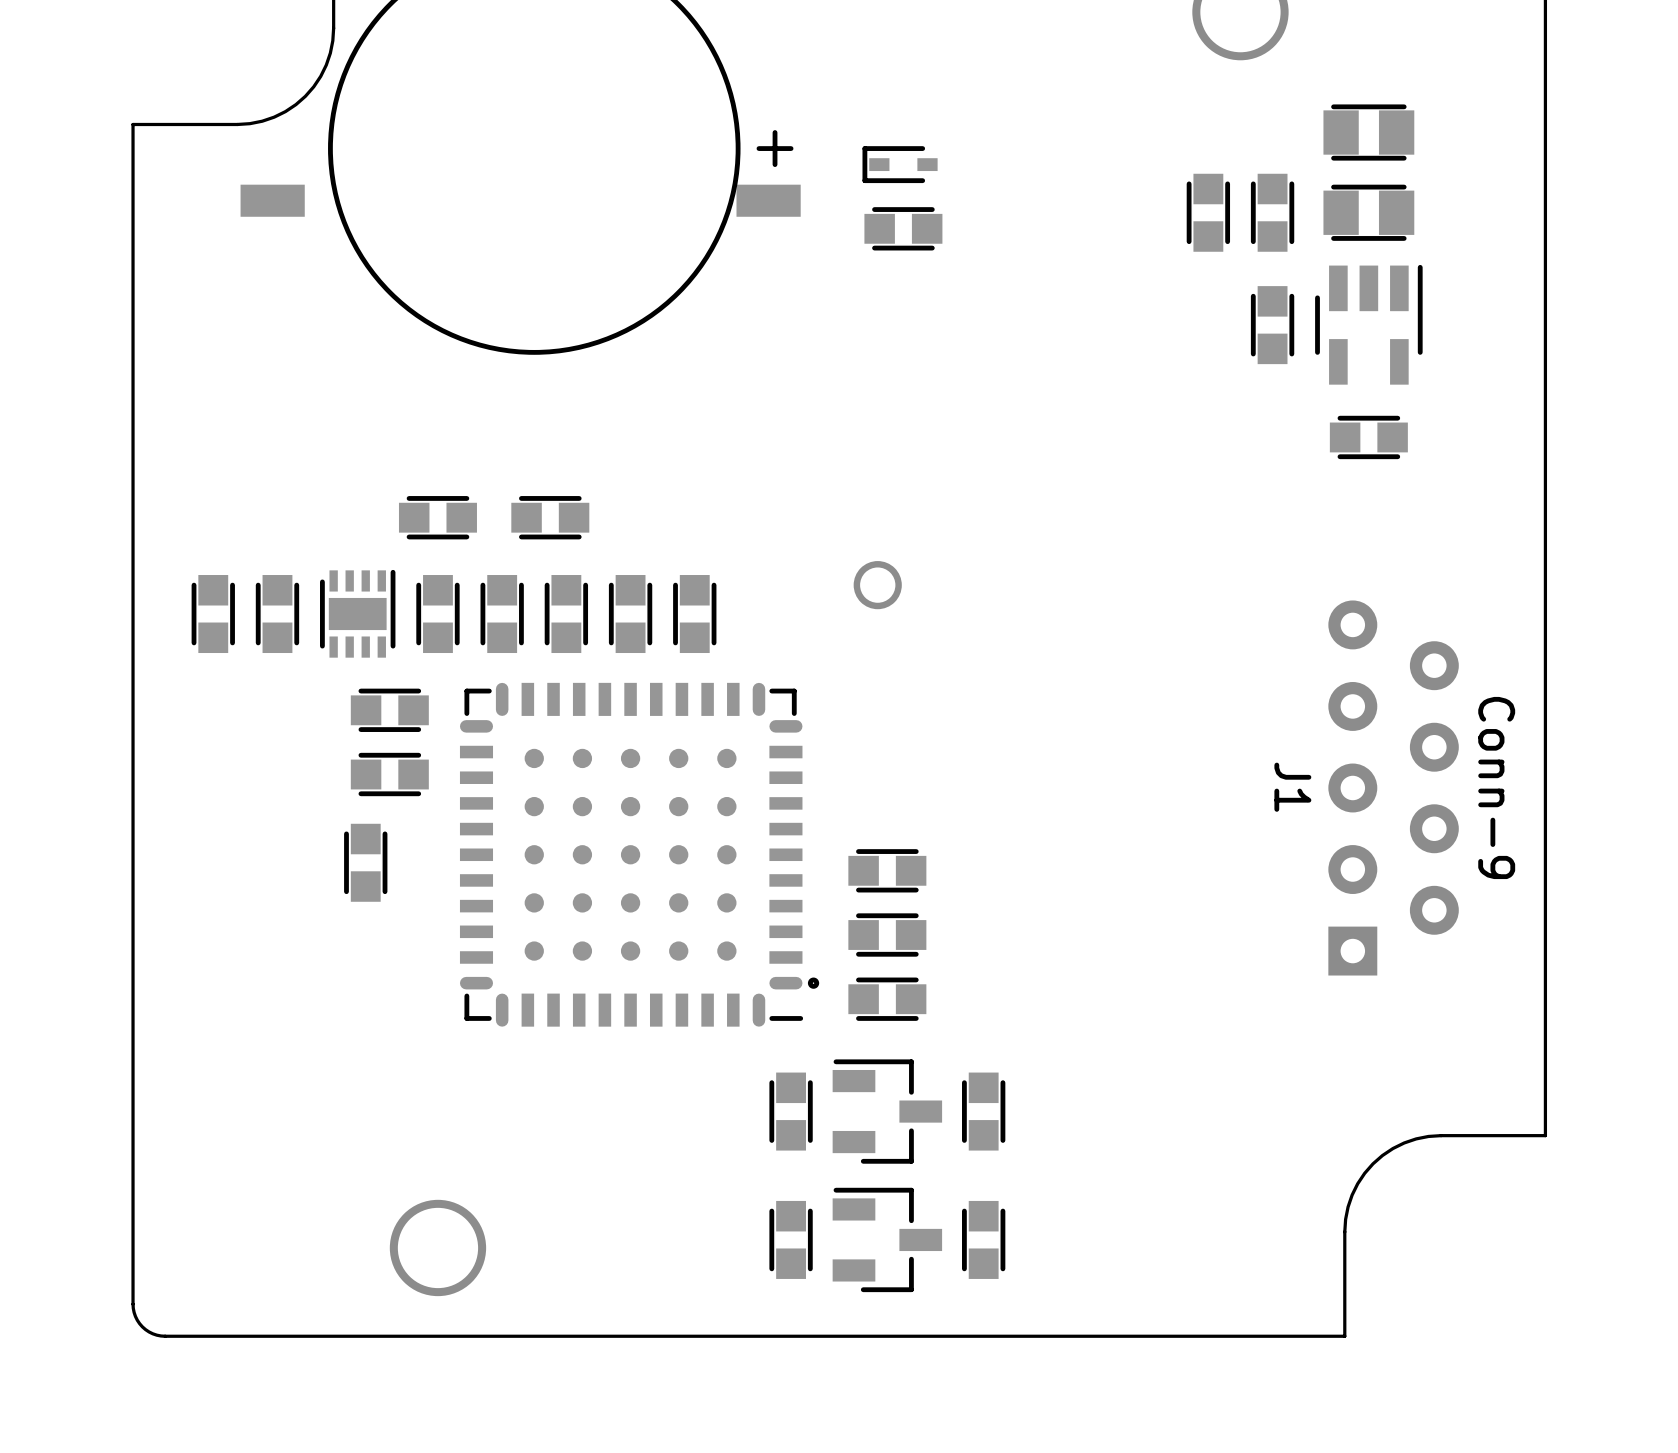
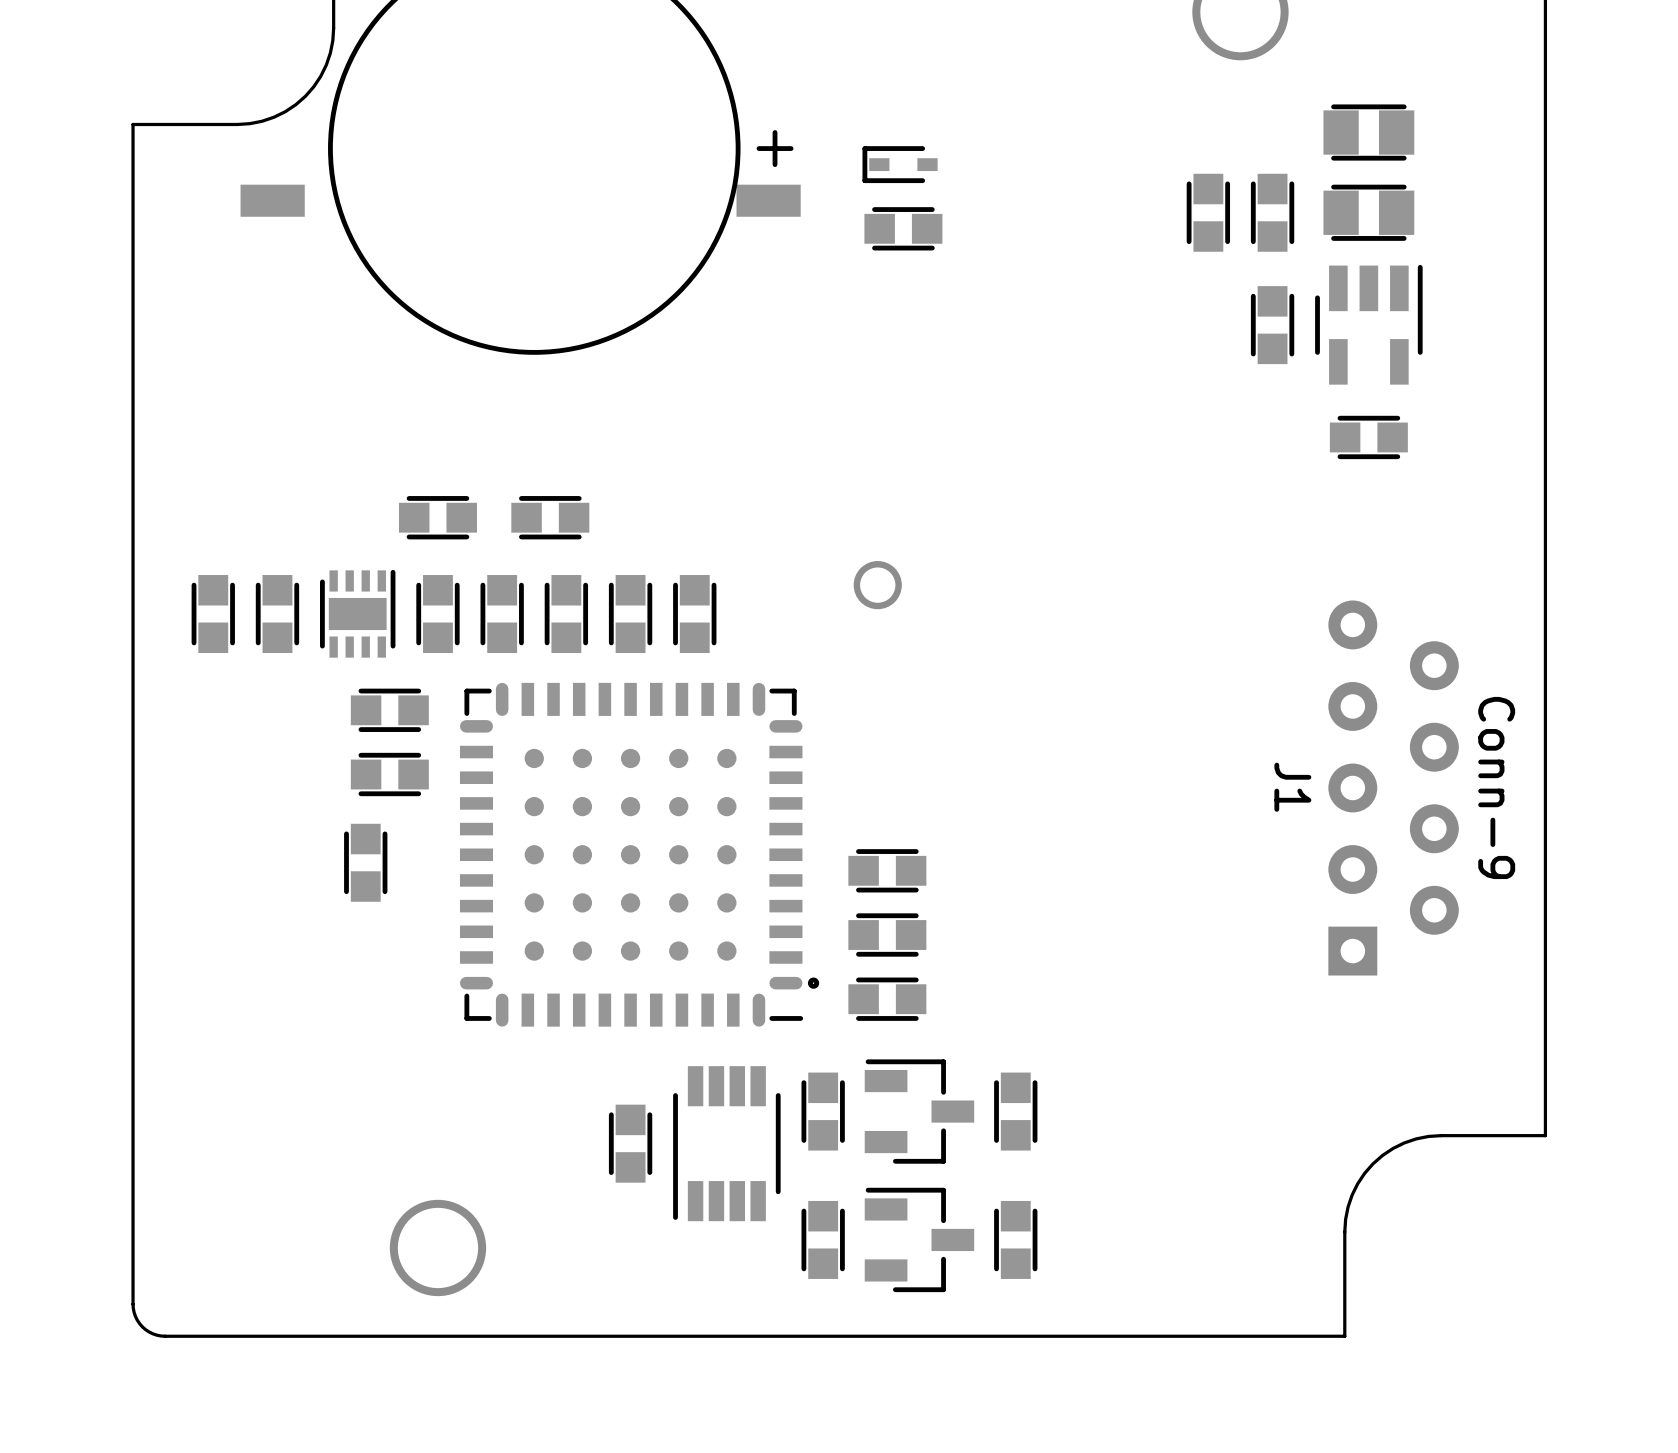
part position: (791, 1111) -> (823, 1111)
part position: (887, 1111) -> (919, 1111)
part position: (983, 1111) -> (1015, 1111)
part: none -> (630, 1143)
part: none -> (726, 1143)
part position: (791, 1239) -> (823, 1239)
part position: (887, 1239) -> (919, 1239)
part position: (983, 1239) -> (1015, 1239)

